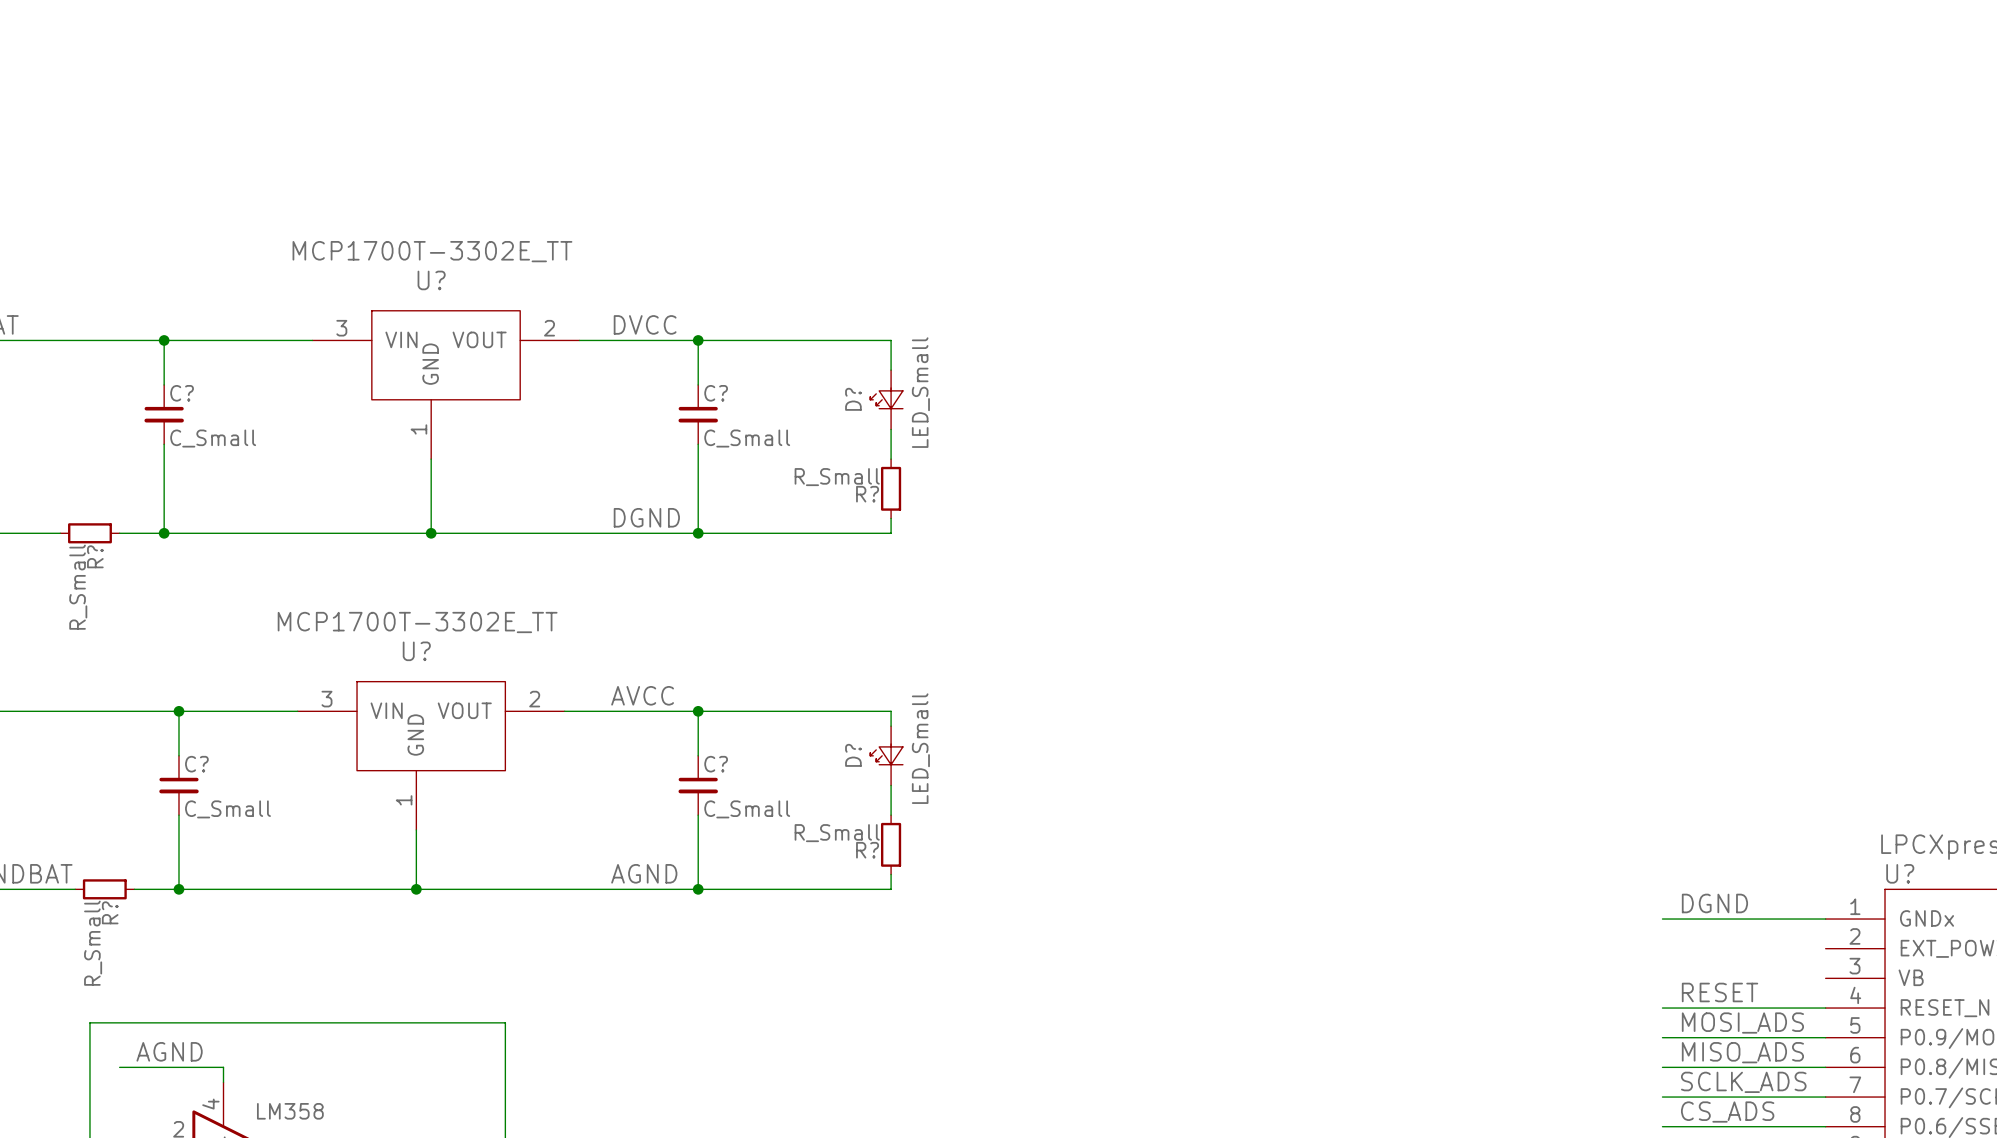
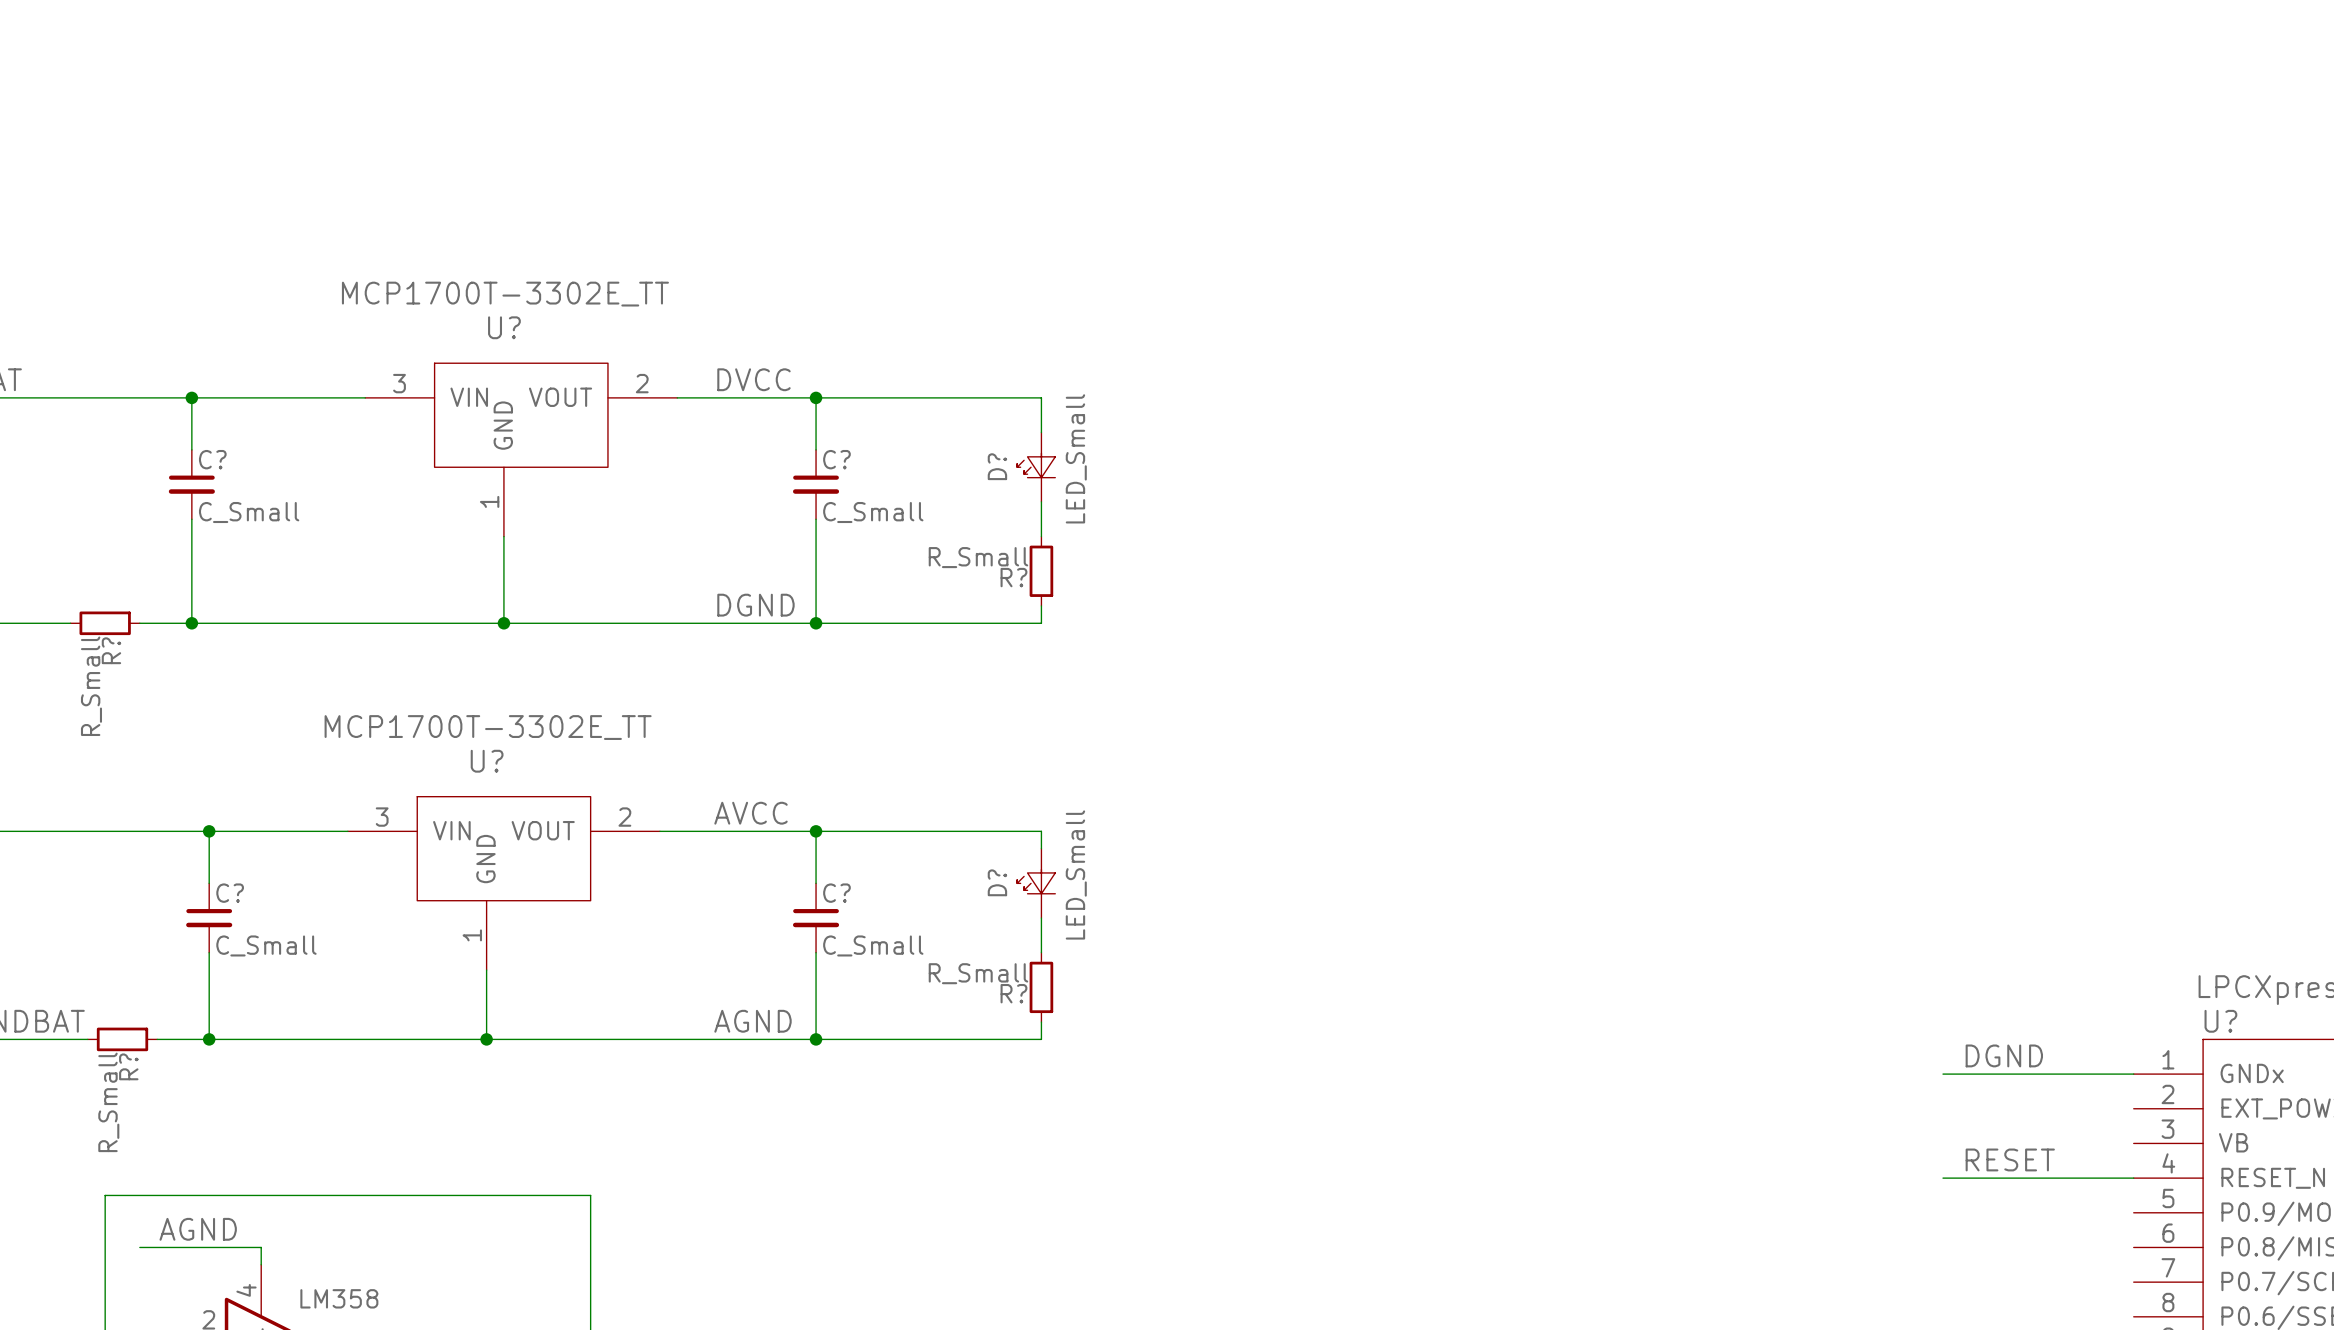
label: MOSI_ADS (1742, 1023) -> none
wire: (1662, 1037) (1825, 1037) -> none
label: MISO_ADS (1742, 1052) -> none
wire: (1662, 1067) (1825, 1067) -> none
label: SCLK_ADS (1743, 1082) -> none
wire: (1662, 1097) (1825, 1097) -> none
label: CS_ADS (1727, 1112) -> none
wire: (1662, 1126) (1825, 1126) -> none

